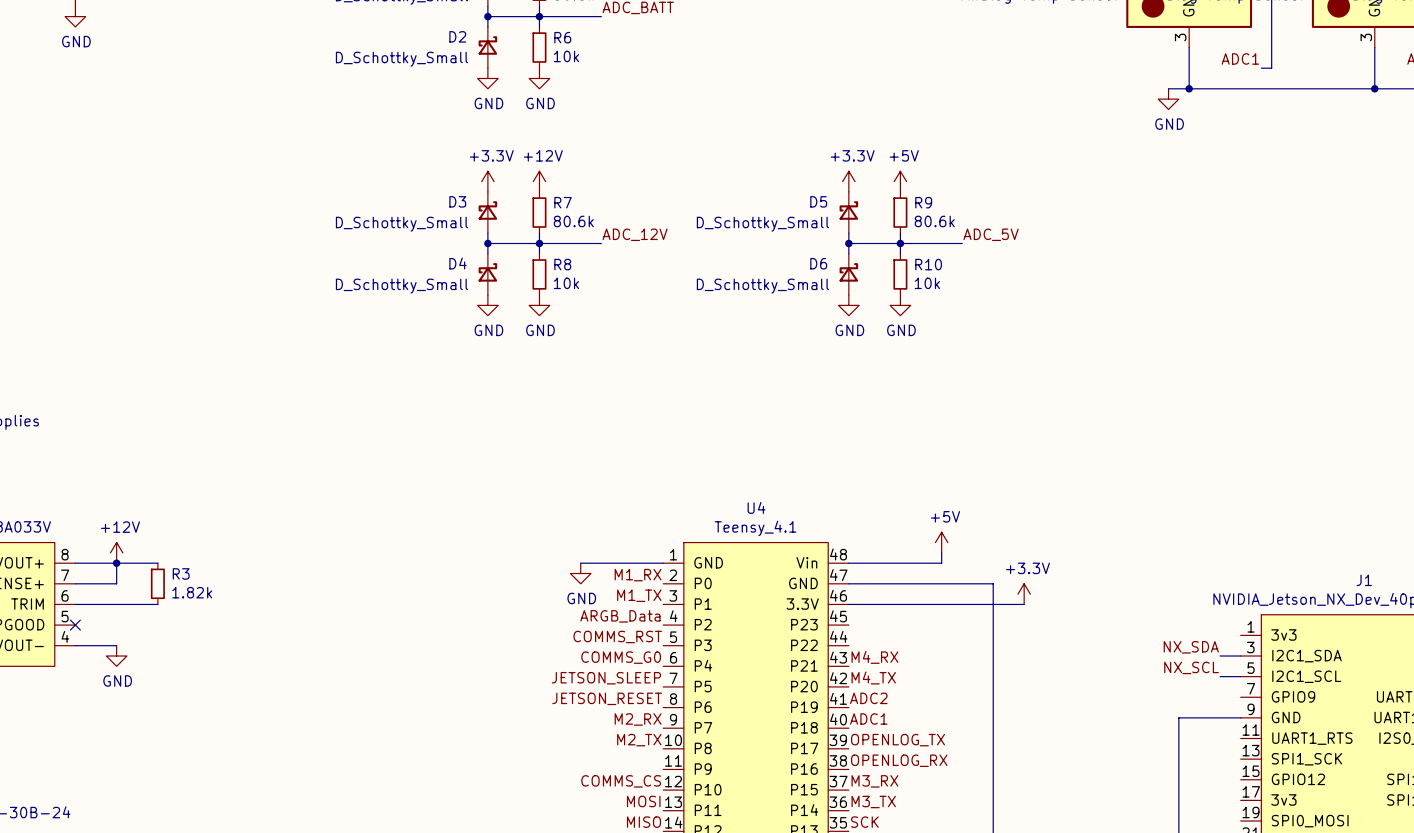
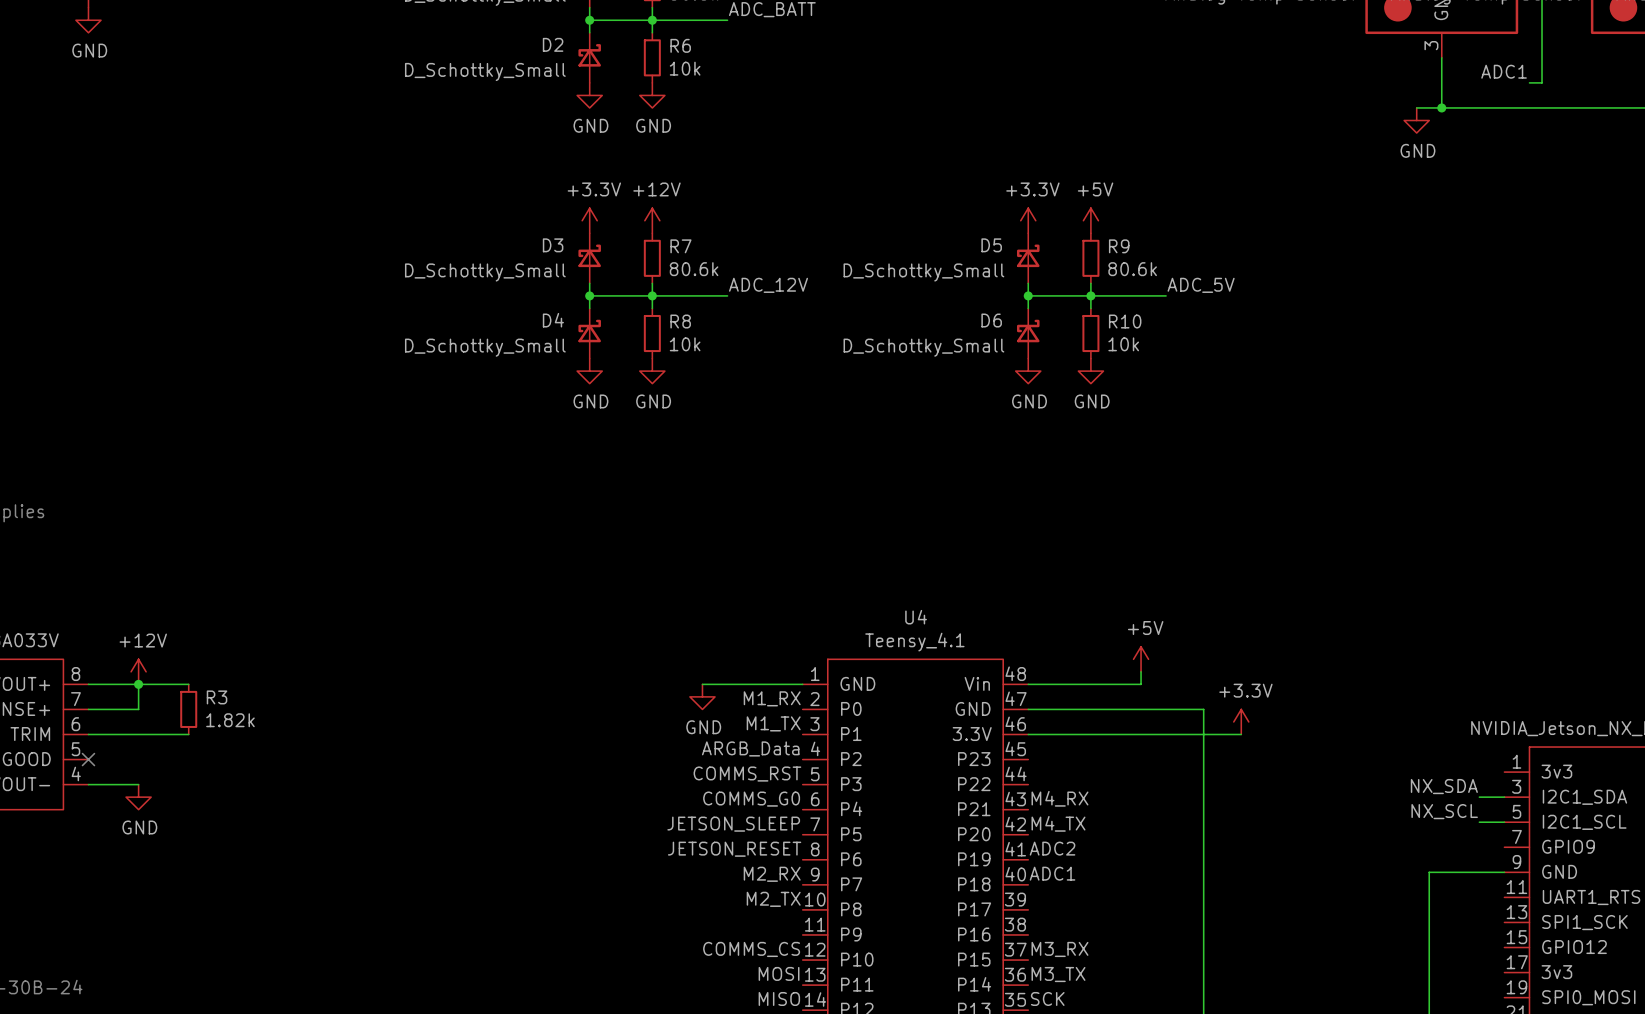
label: OPENLOG_TX (898, 740) -> none
label: OPENLOG_RX (899, 760) -> none

